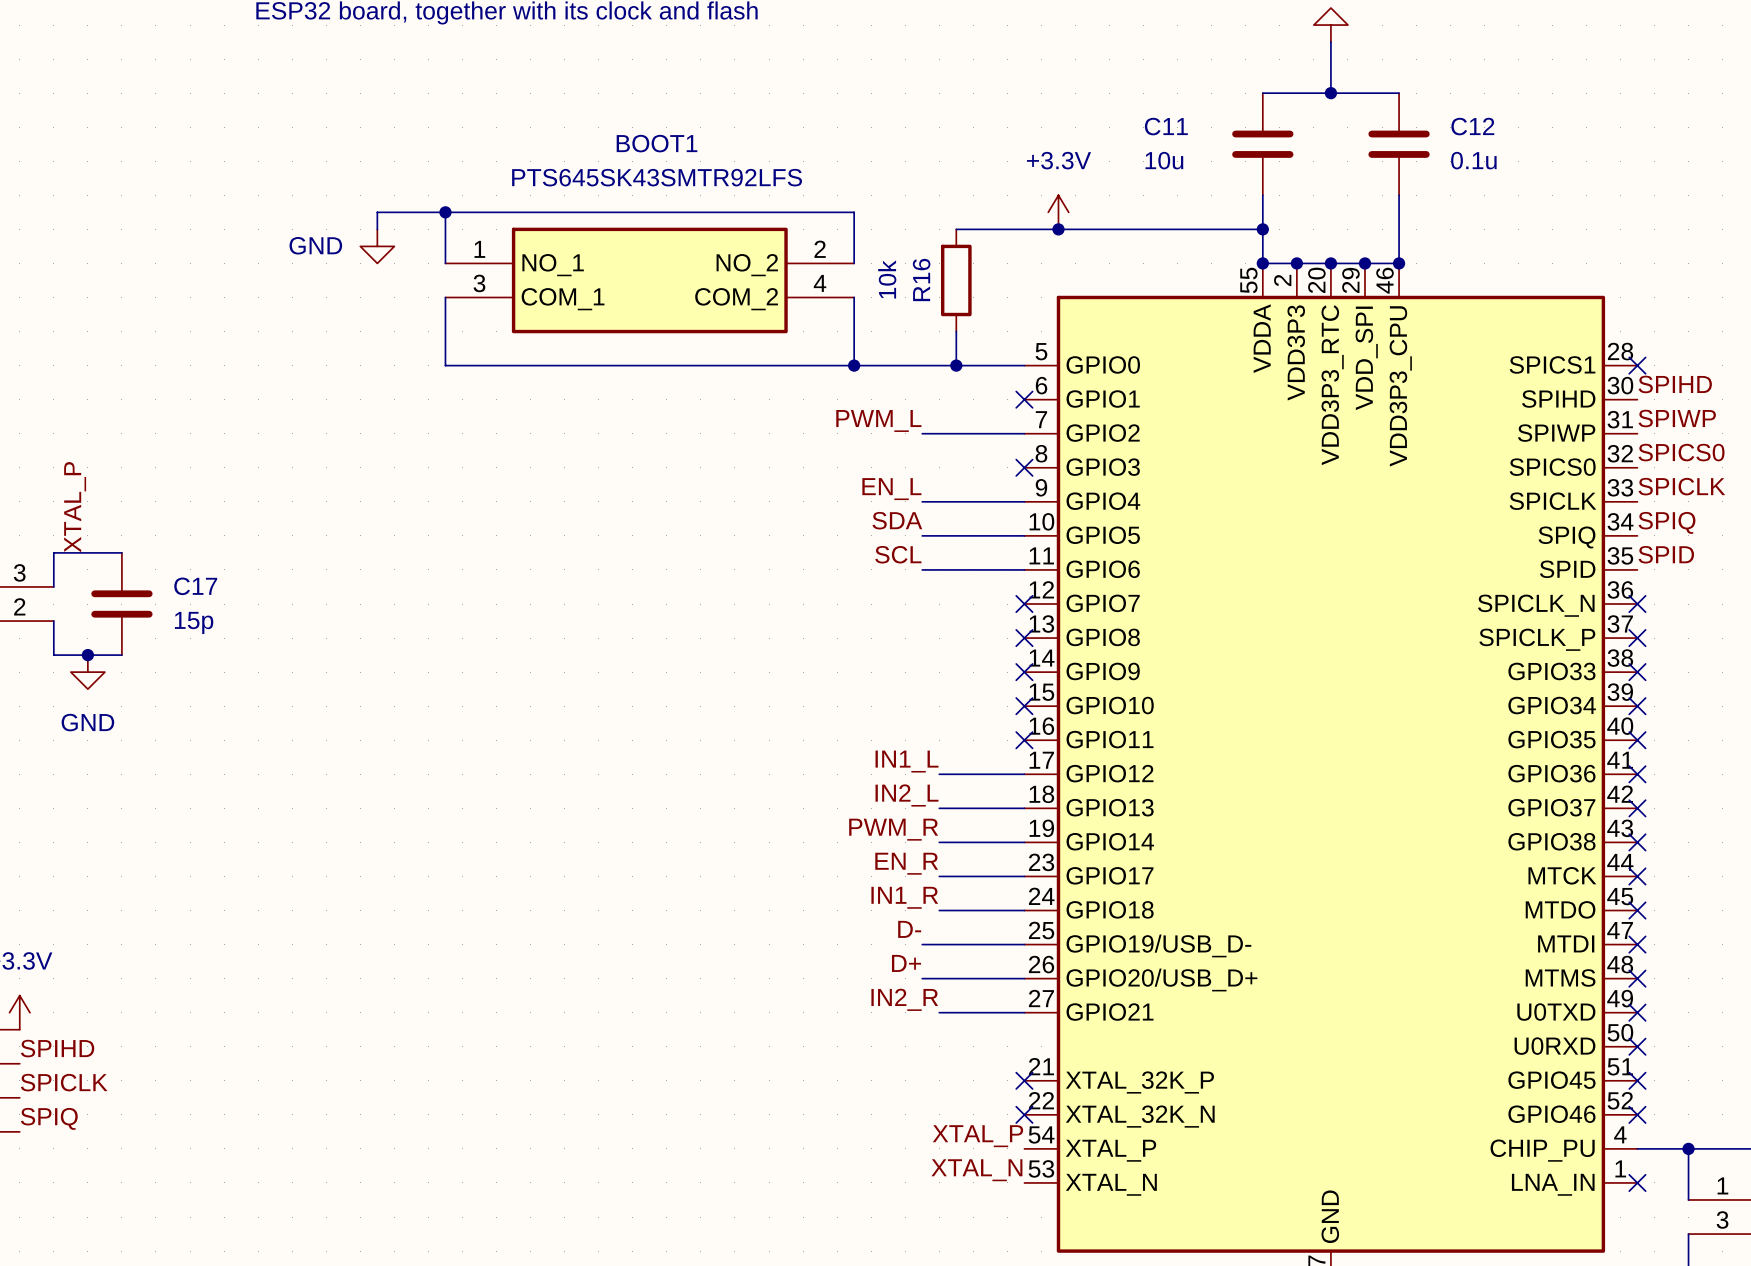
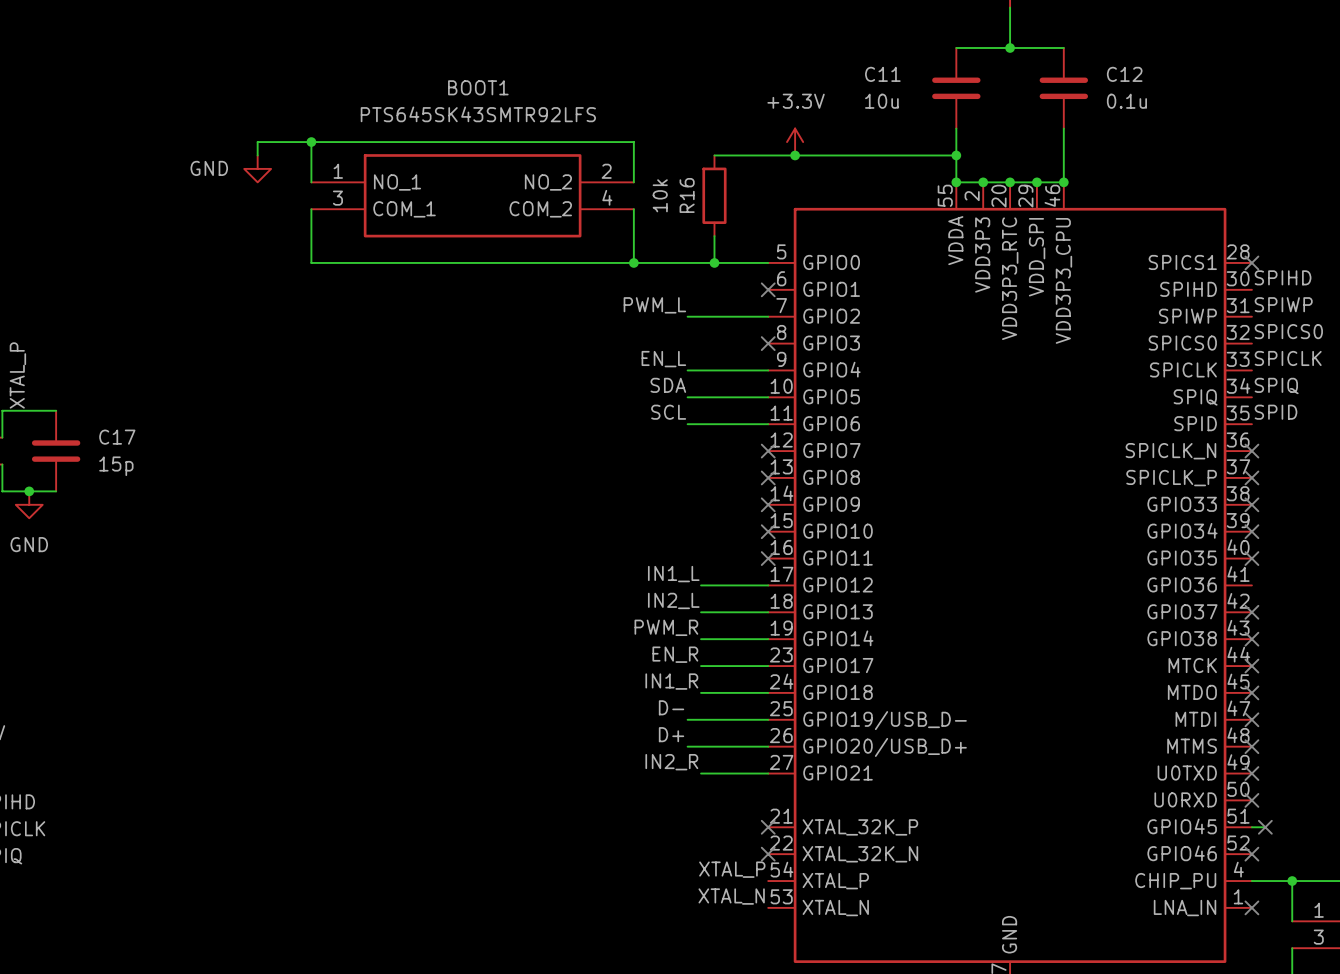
no-connect mark: (1637, 774) -> none
wire: none -> (1251, 827) (1265, 827)
no-connect mark position: (1637, 1080) -> (1265, 827)

